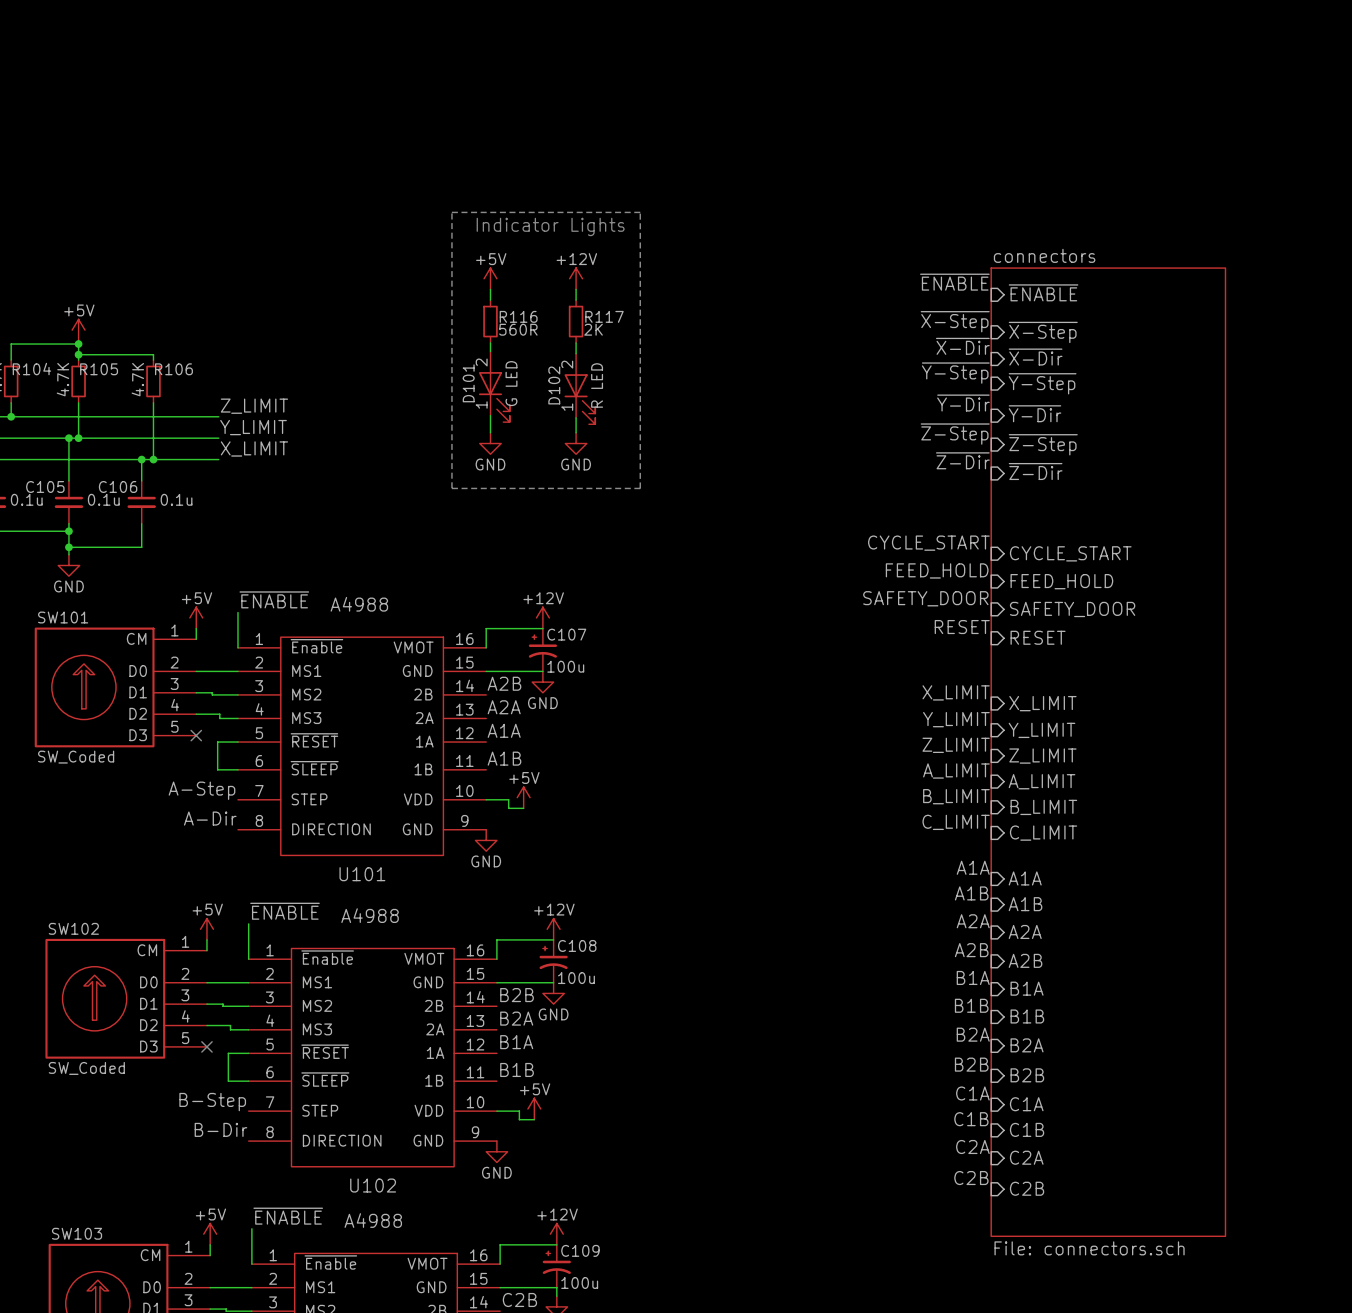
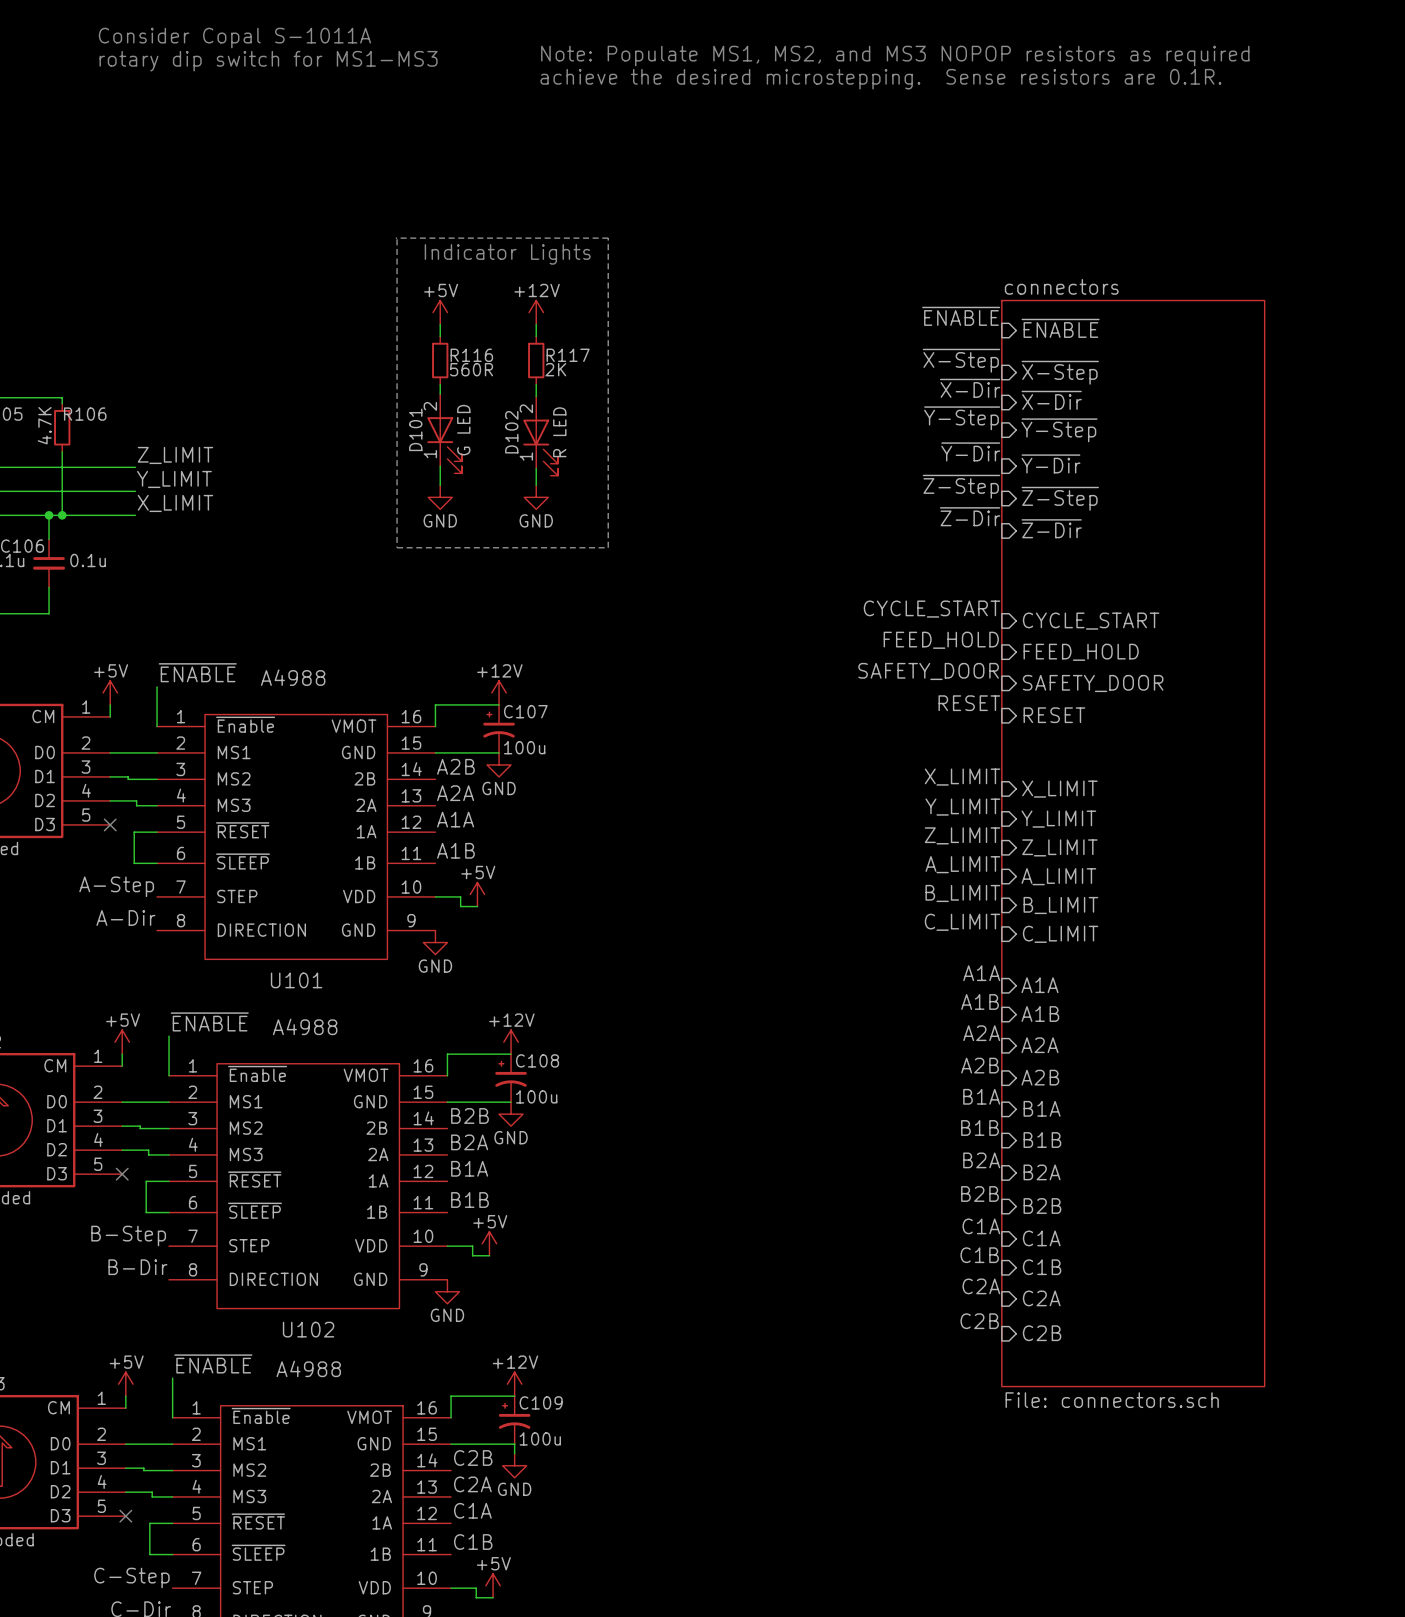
text: none -> Consider Copal S-1011A (234, 38)
text: none -> Note: Populate MS1, MS2, and MS3 NOPOP resistors as required (895, 56)
text: none -> rotary dip switch for MS1-MS3 (268, 61)
text: none -> achieve the desired microstepping. Sense resistors are 0.1R. (880, 79)

